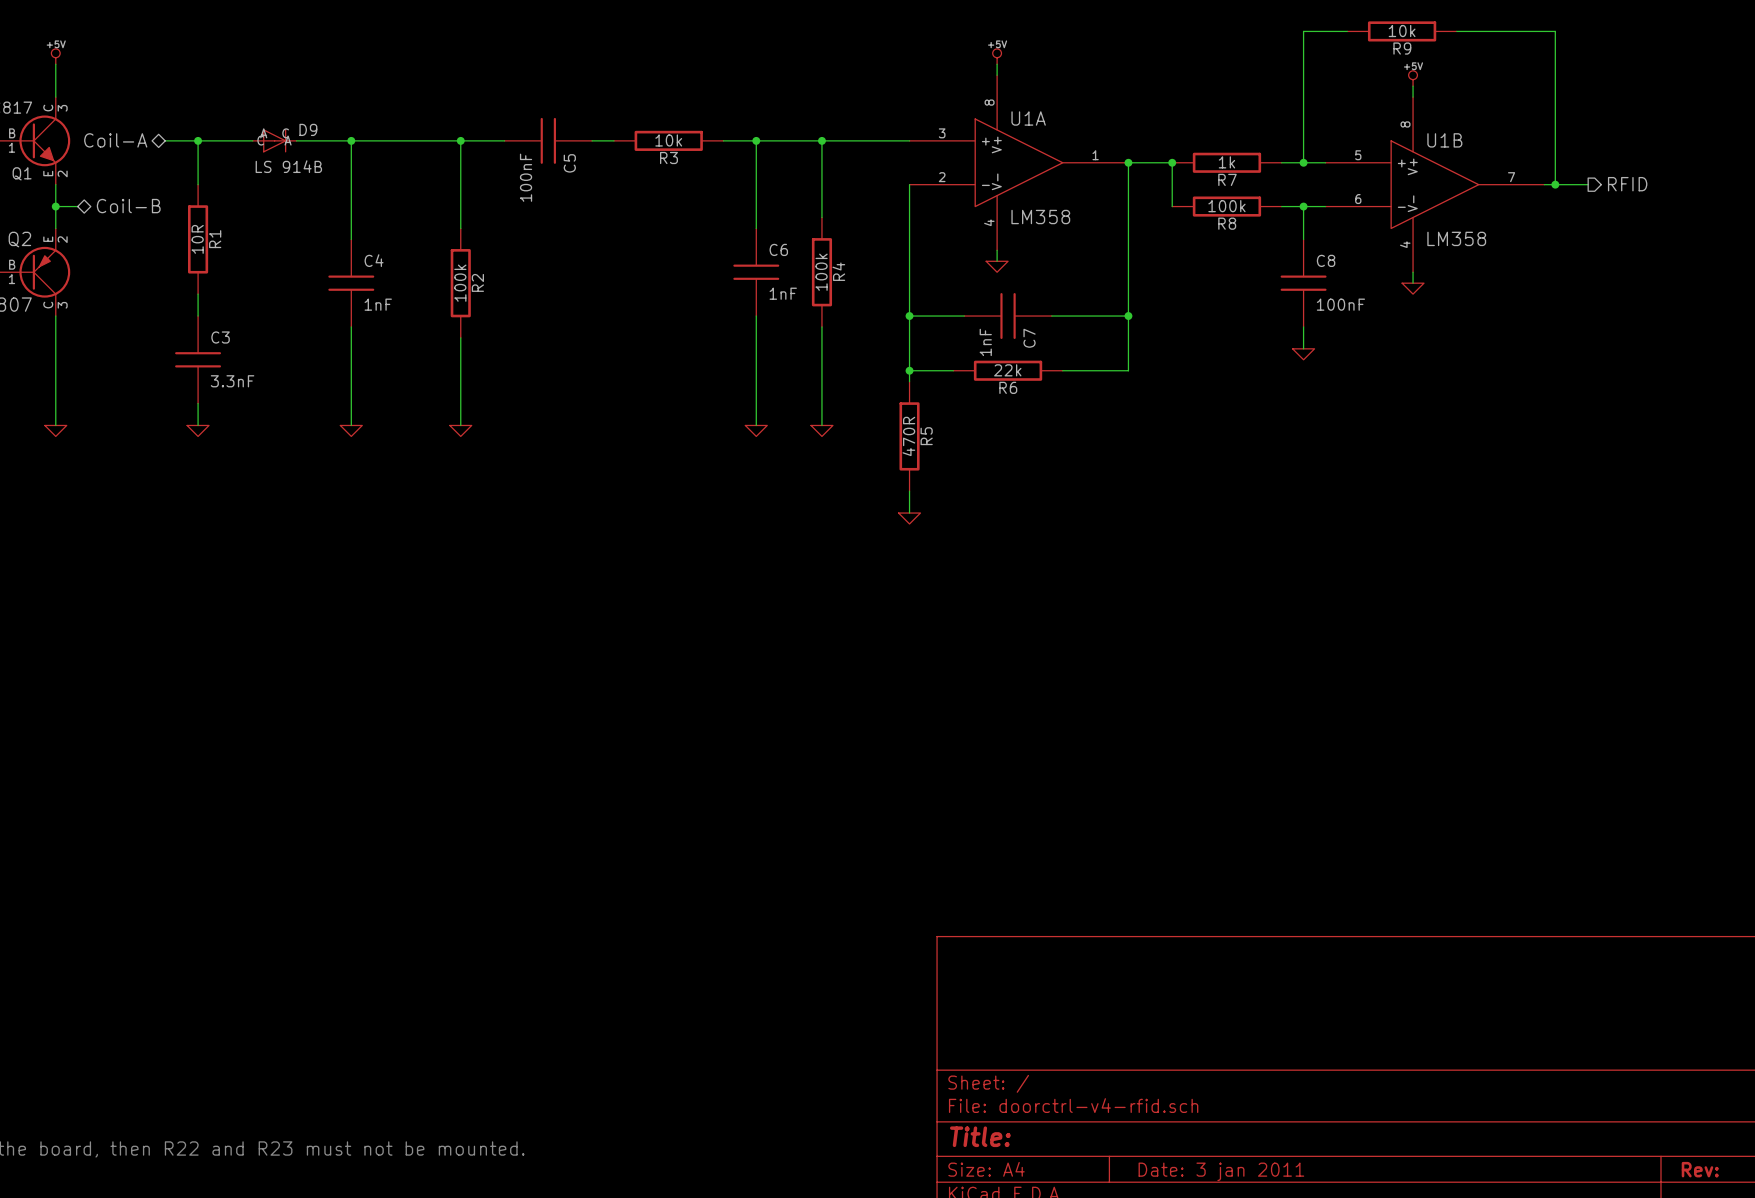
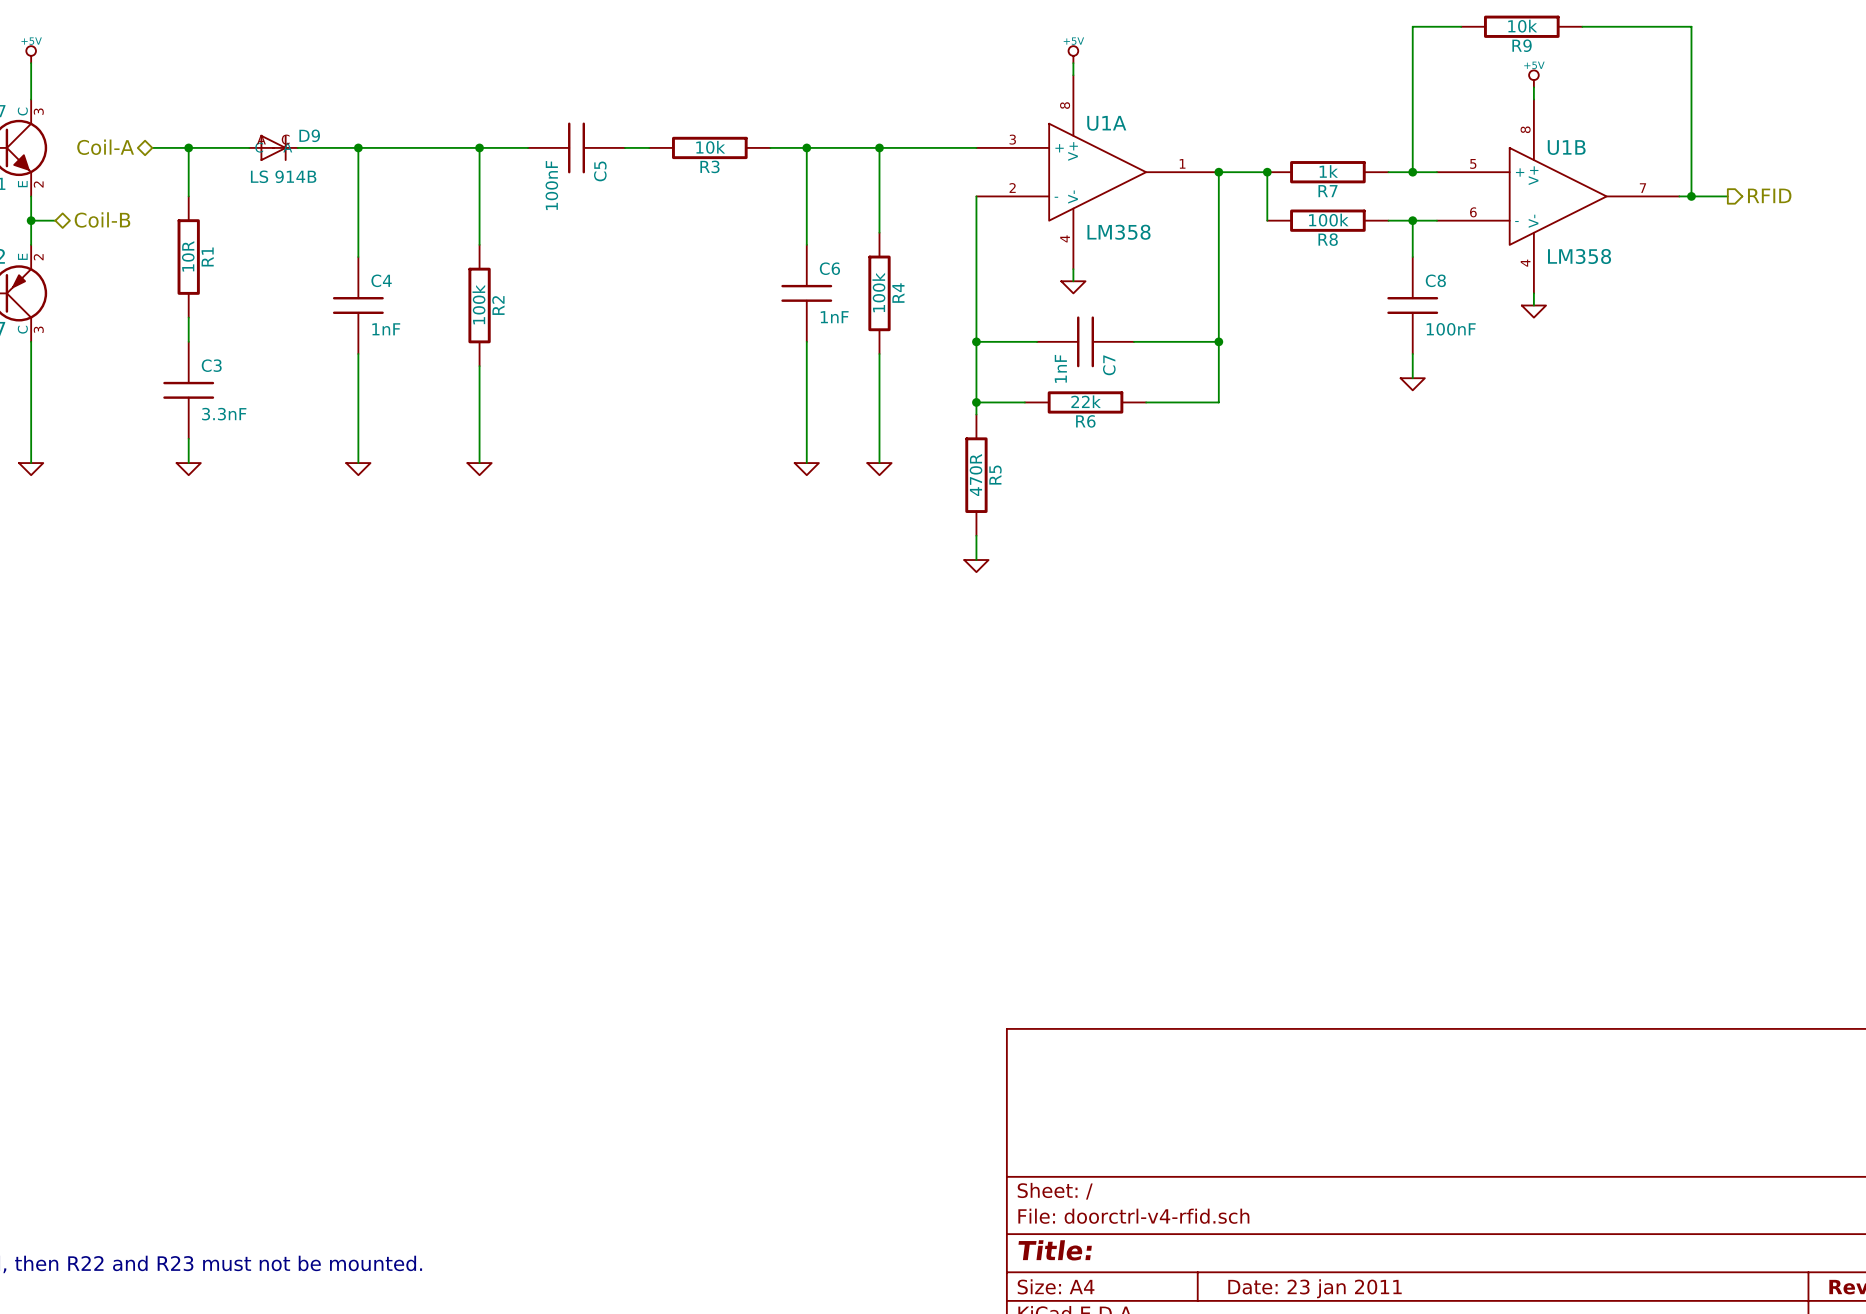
title block: Date: 3 jan 2011 (1221, 1171) -> Date: 23 jan 2011 (1314, 1288)

